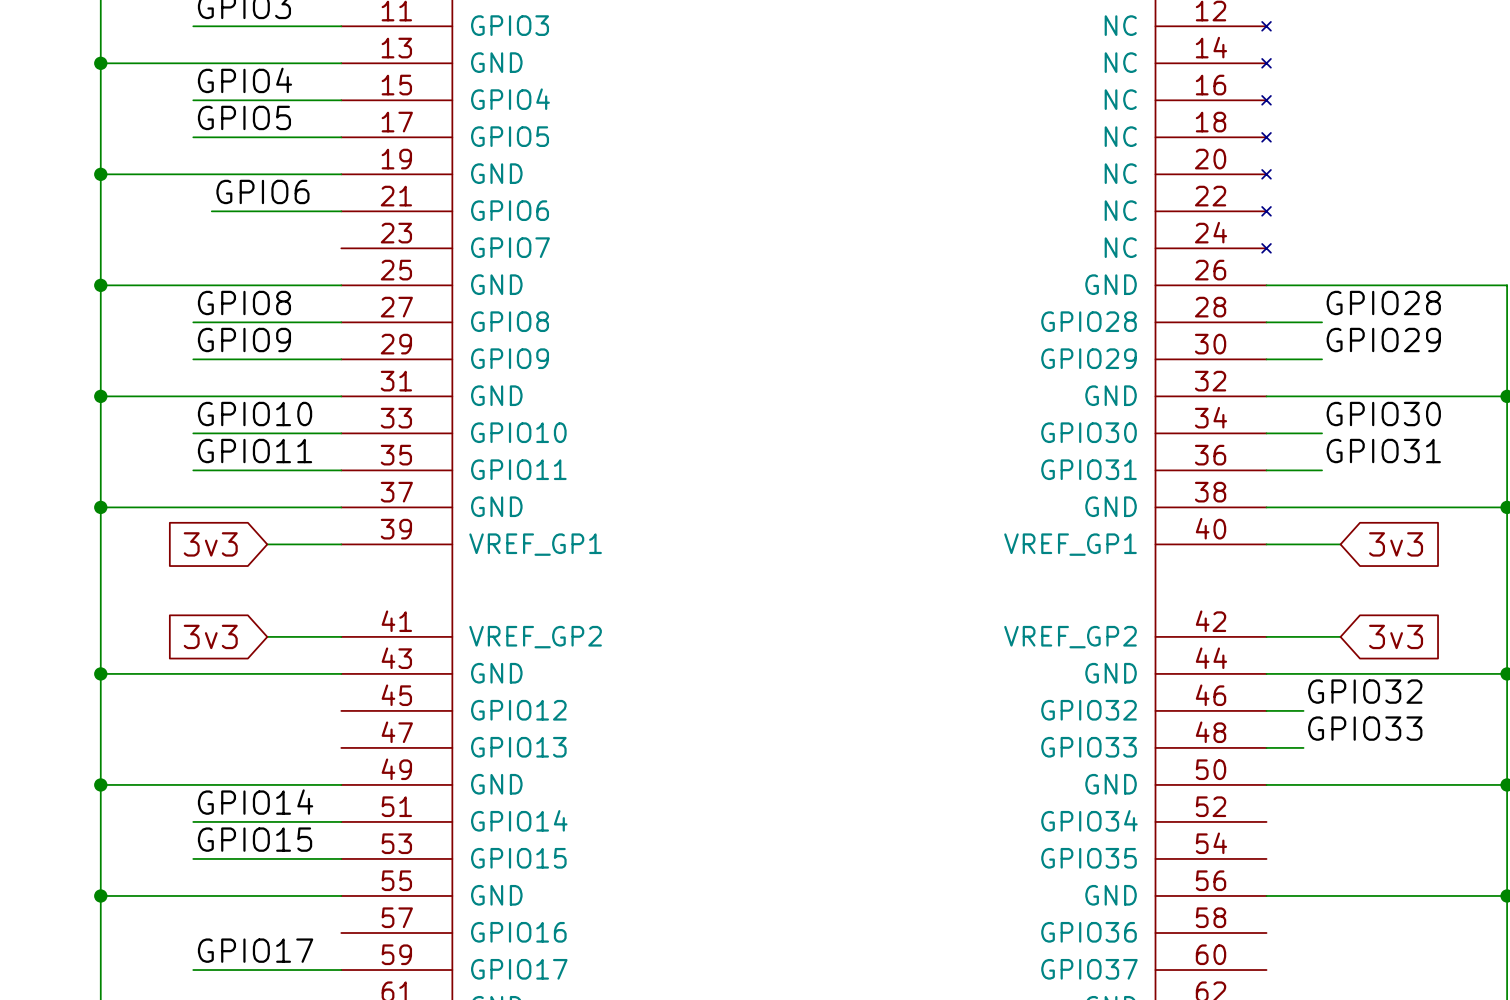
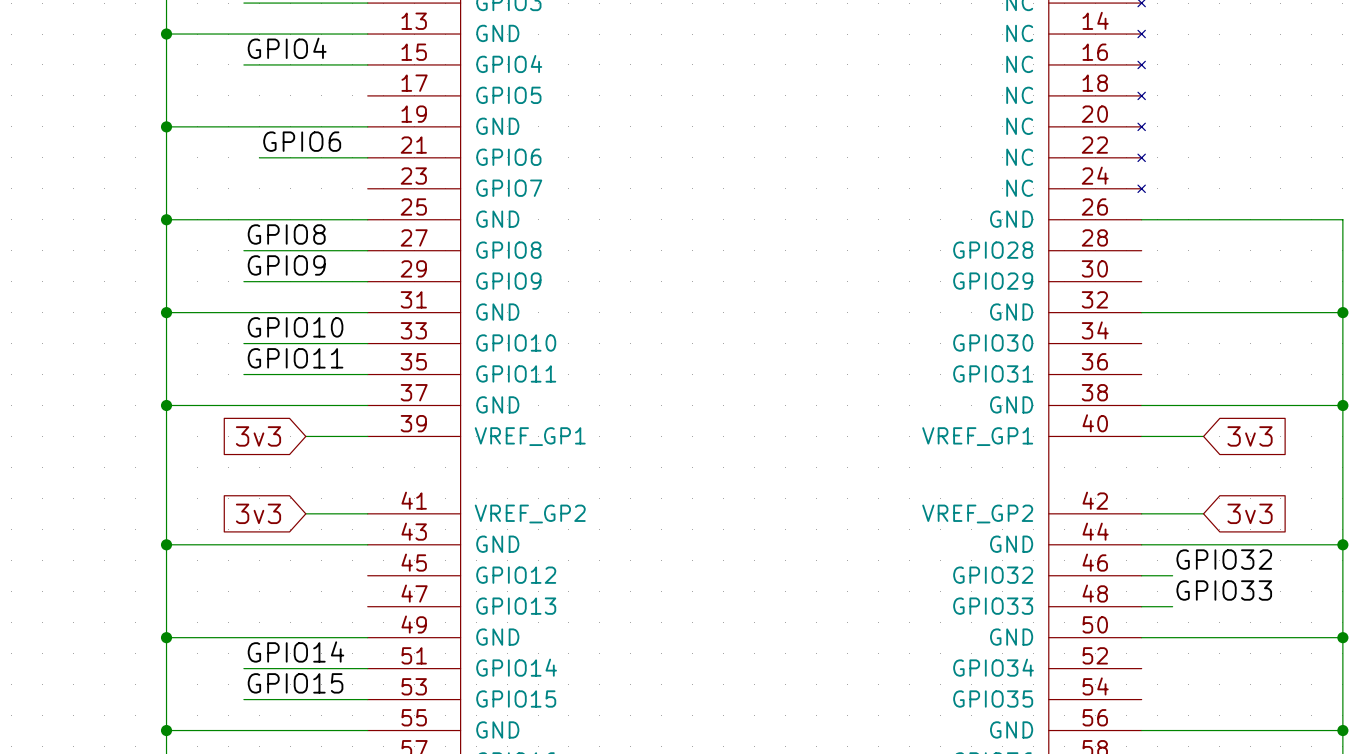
label: GPIO5 (244, 117) -> none
wire: (193, 137) (341, 137) -> none
label: GPIO28 (1383, 302) -> none
wire: (1266, 322) (1322, 322) -> none
label: GPIO29 (1383, 340) -> none
wire: (1266, 359) (1322, 359) -> none
label: GPIO30 (1383, 414) -> none
wire: (1266, 433) (1322, 433) -> none
label: GPIO31 (1383, 451) -> none
wire: (1266, 470) (1322, 470) -> none

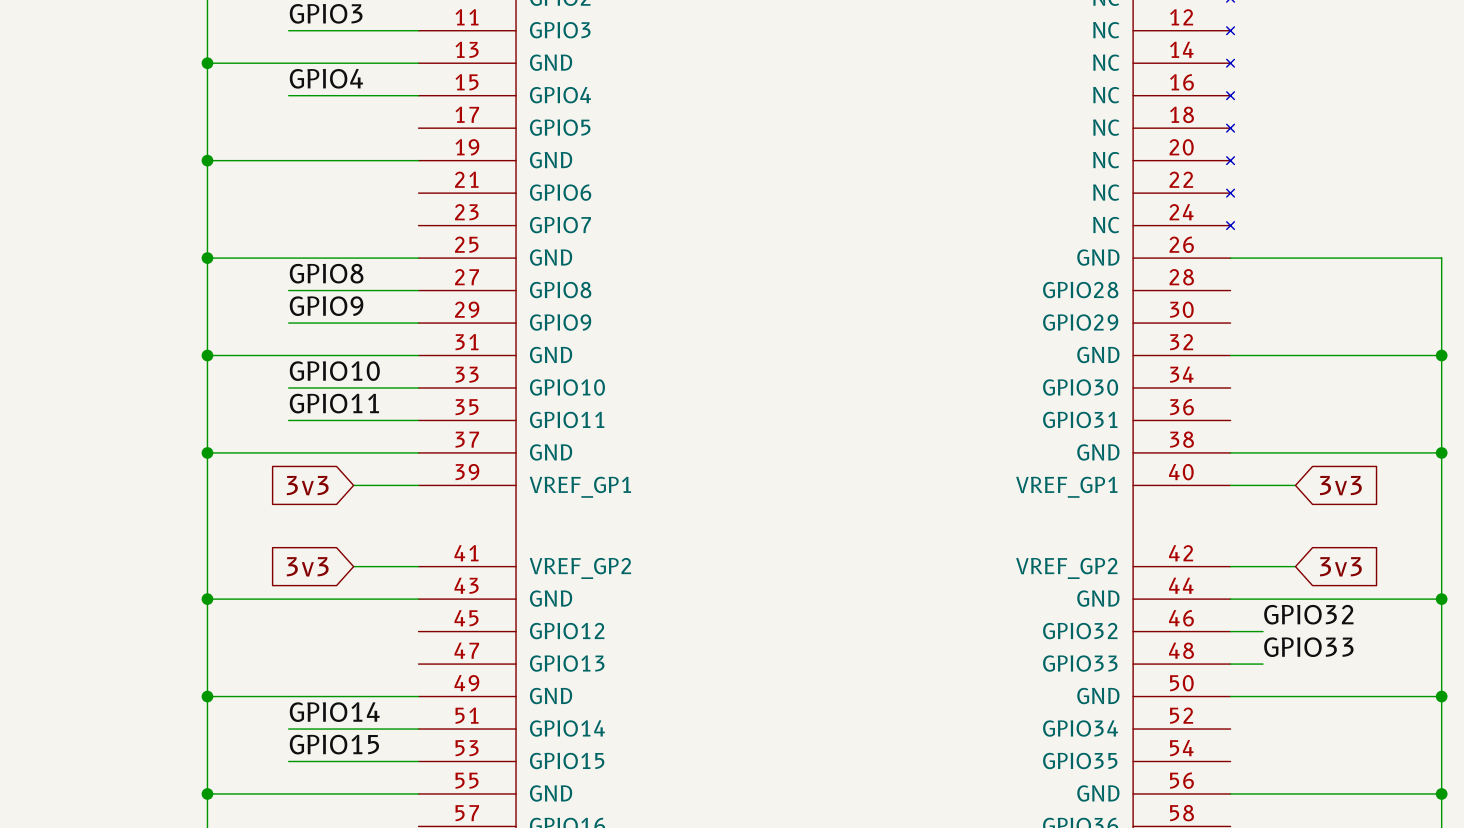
label: GPIO6 (302, 141) -> none
wire: (259, 157) (367, 157) -> none

